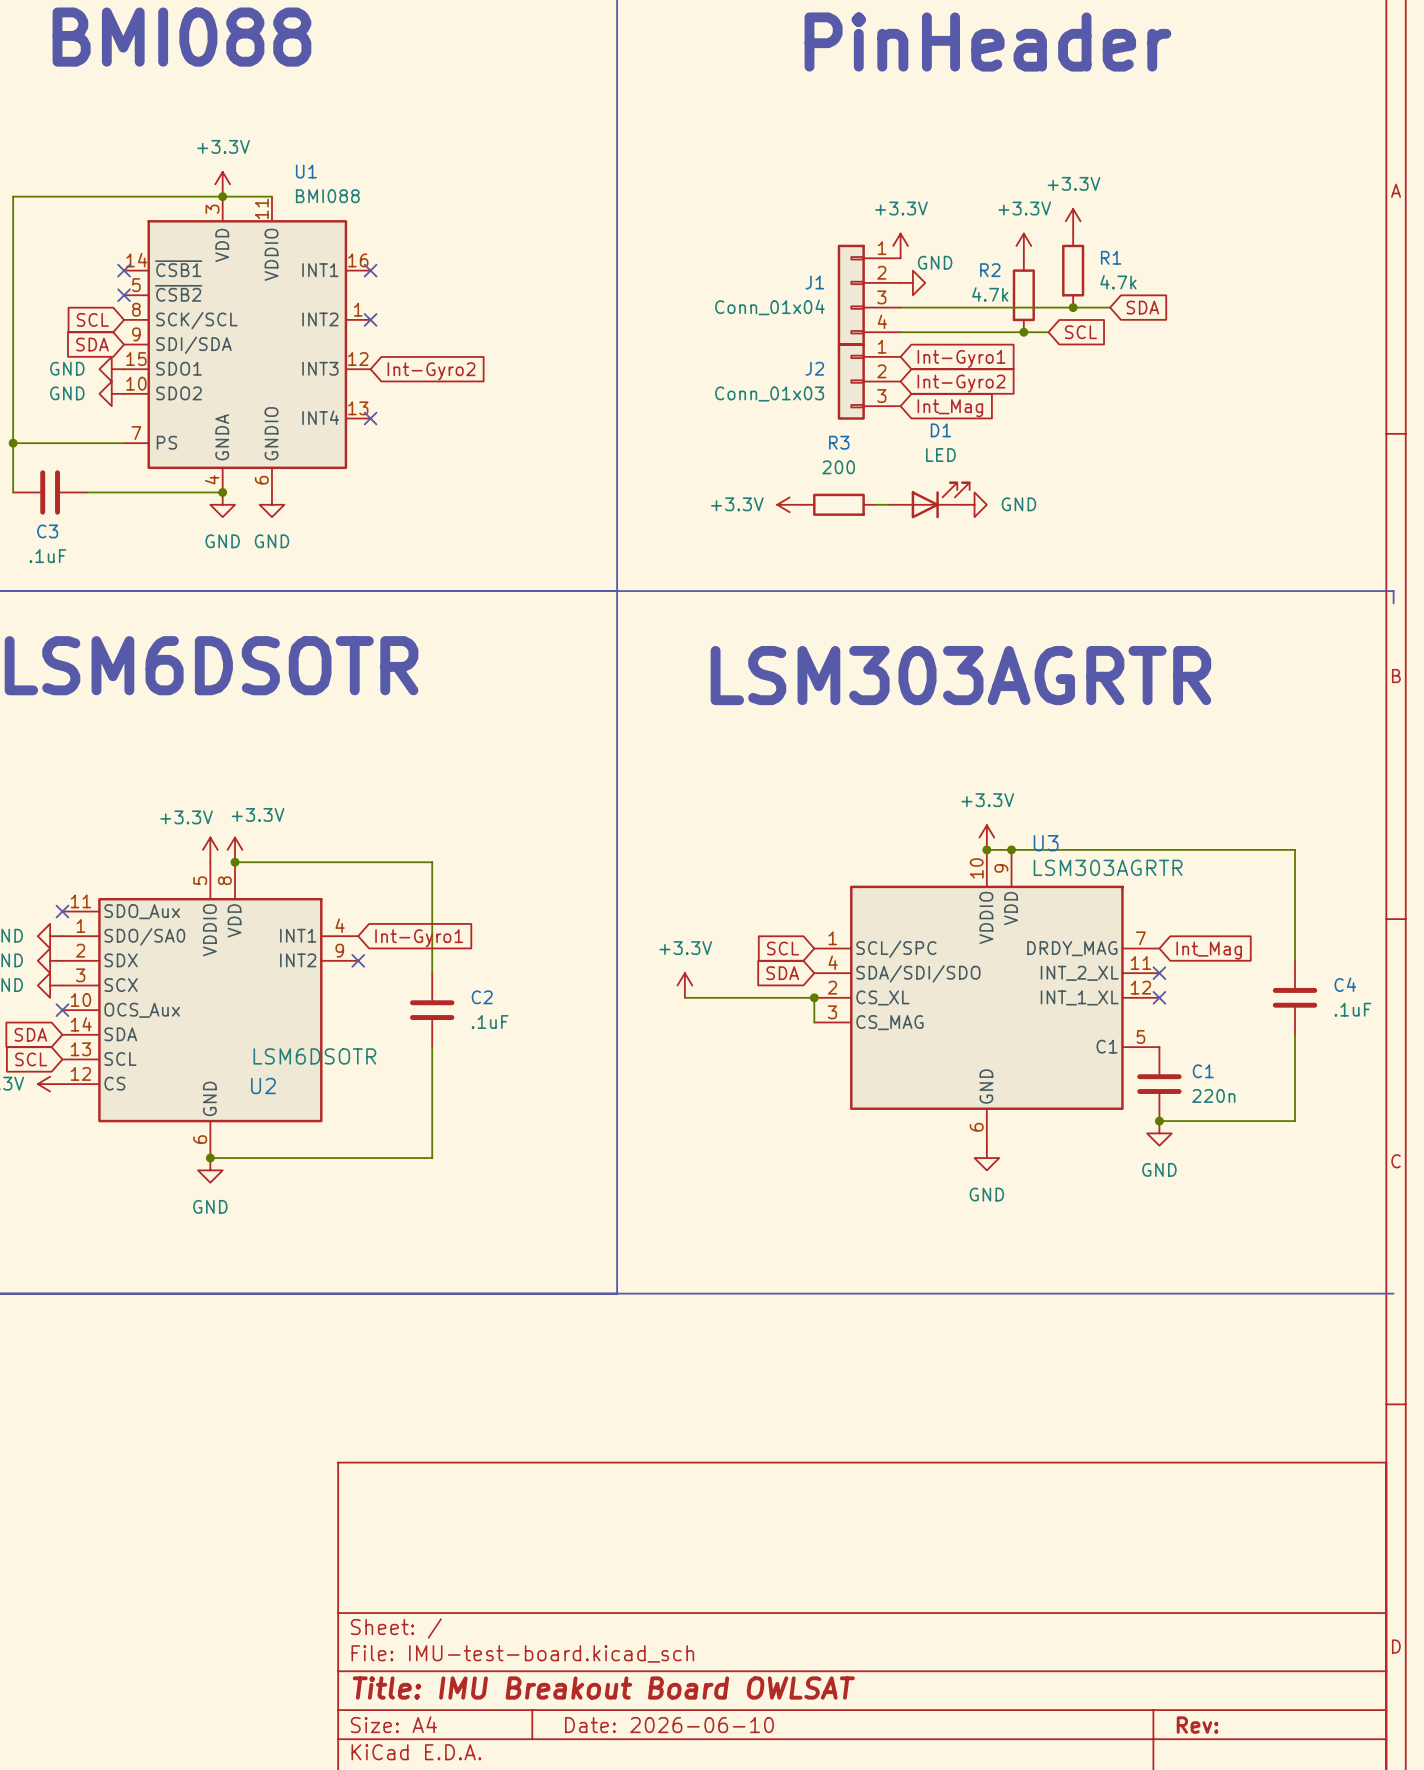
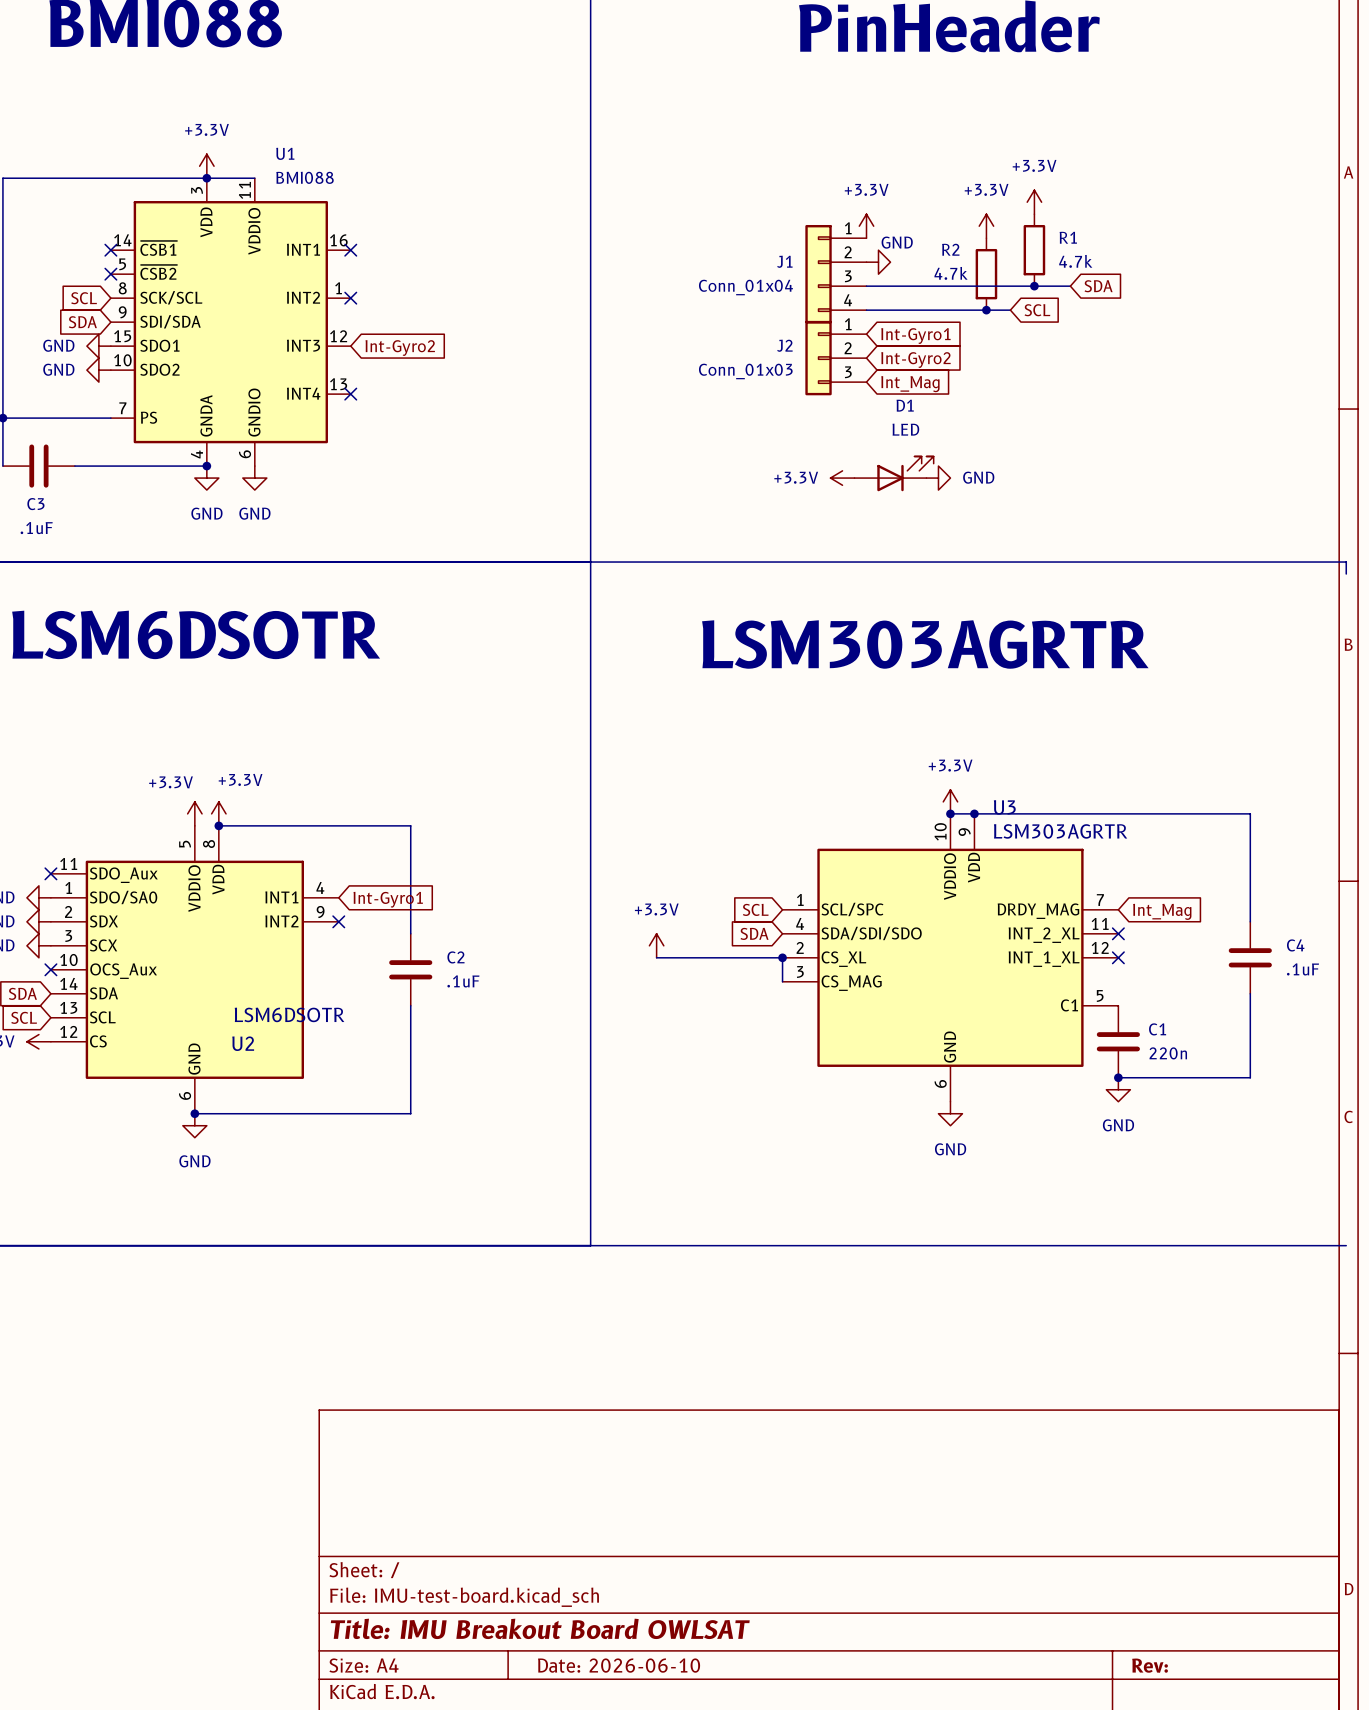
power symbol position: +3.3V (789, 504) -> +3.3V (842, 478)
R3: 200 (838, 504) -> none

